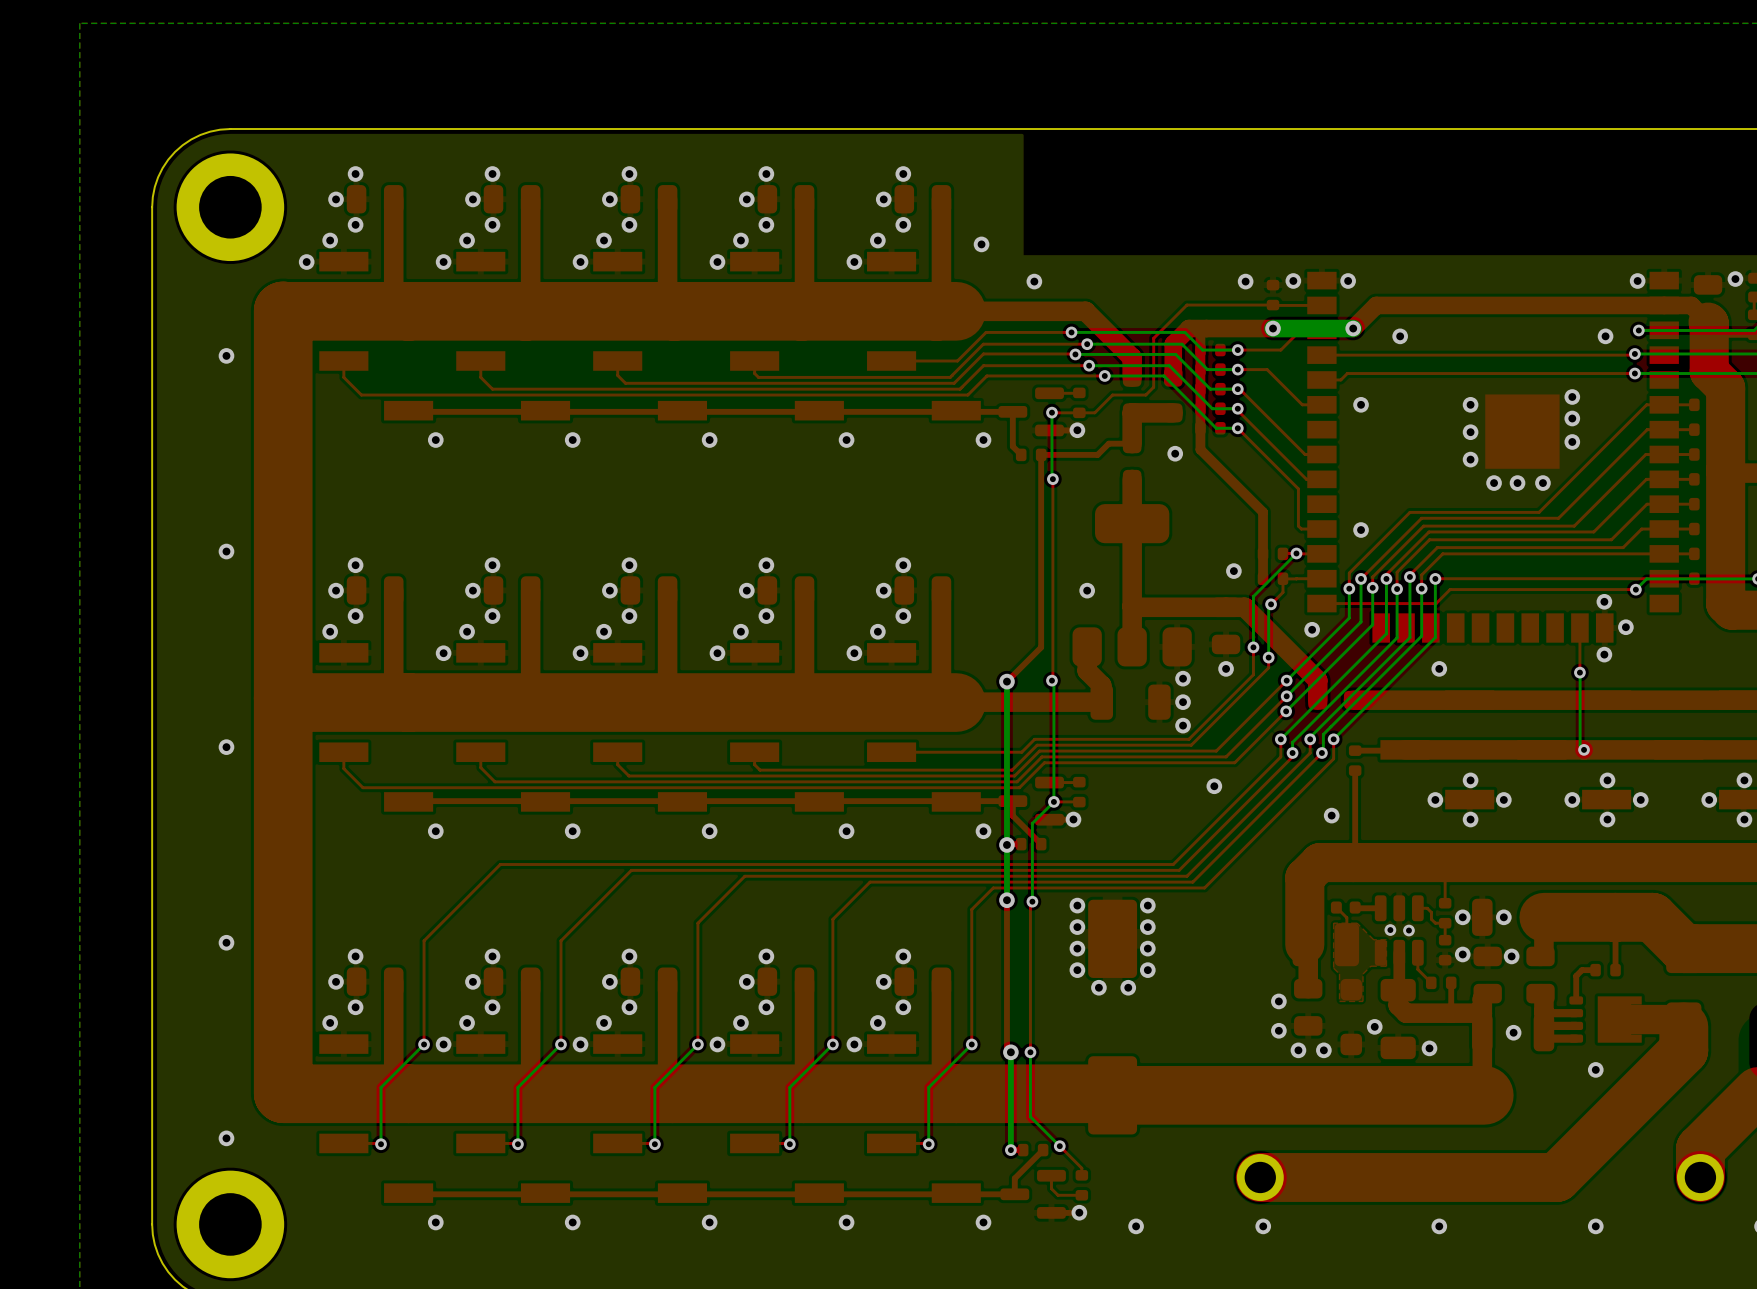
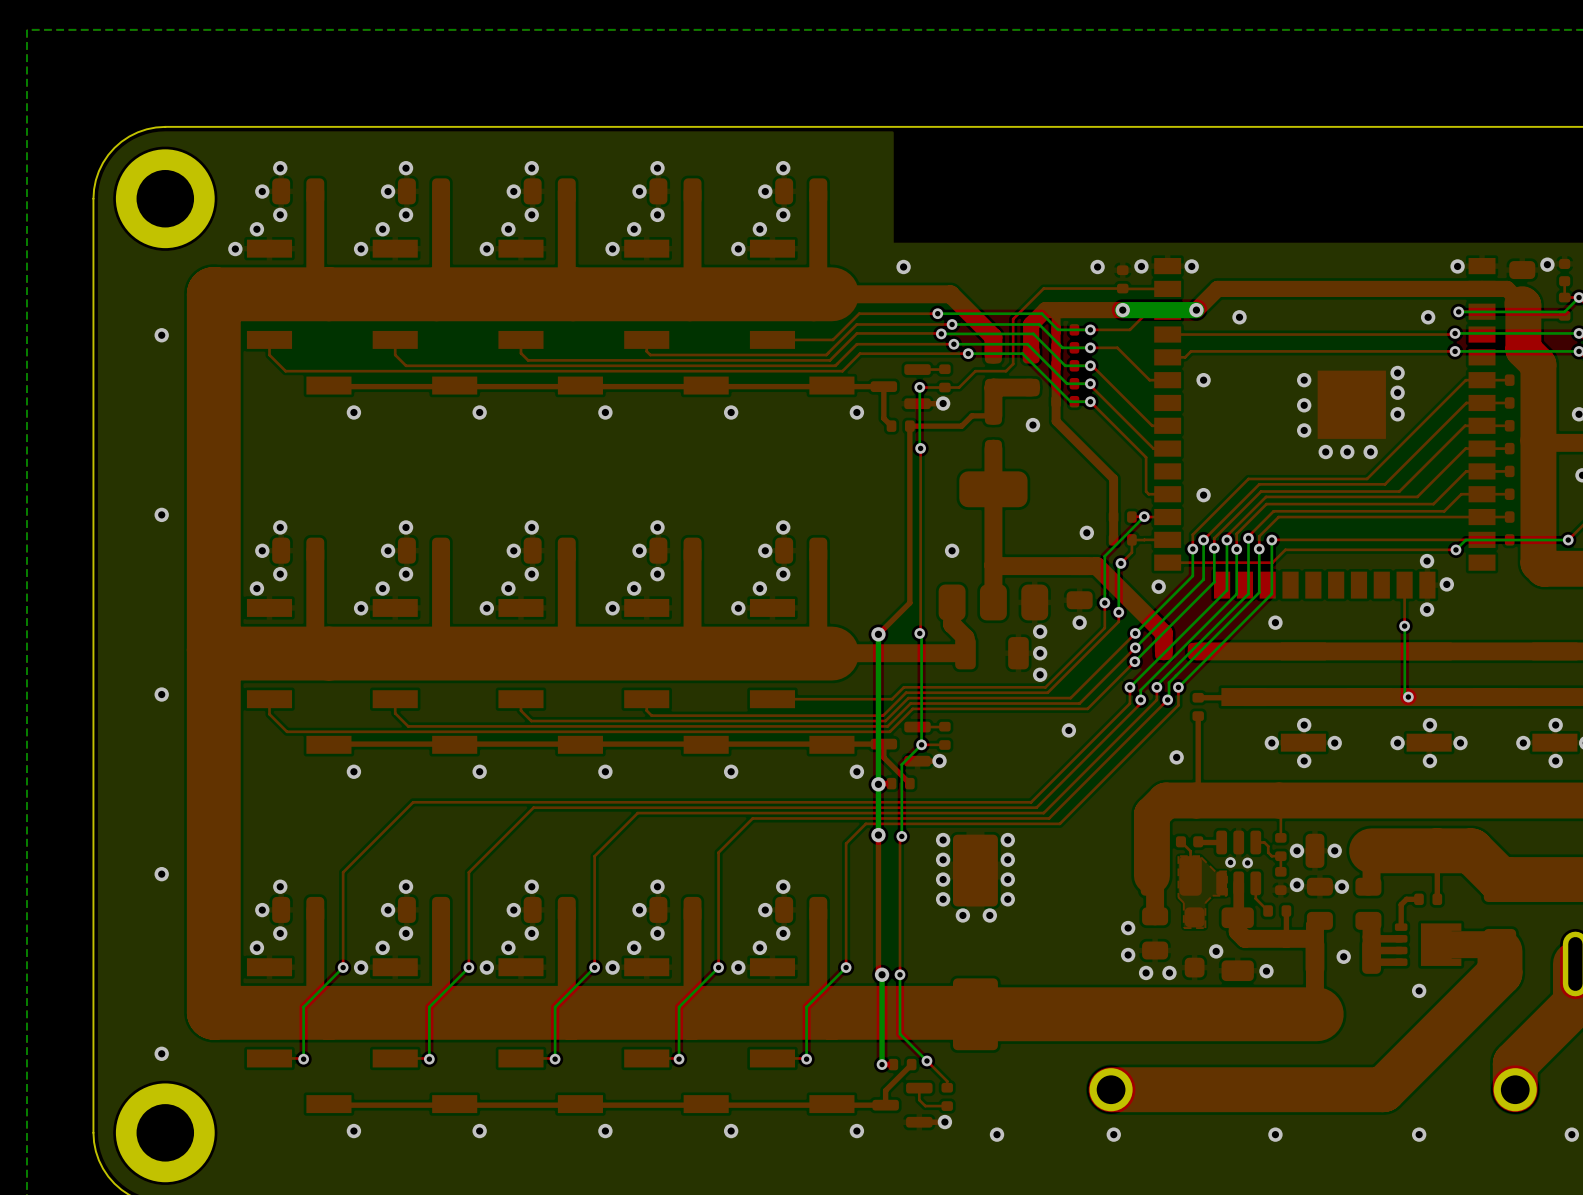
via: (981, 244) -> none

